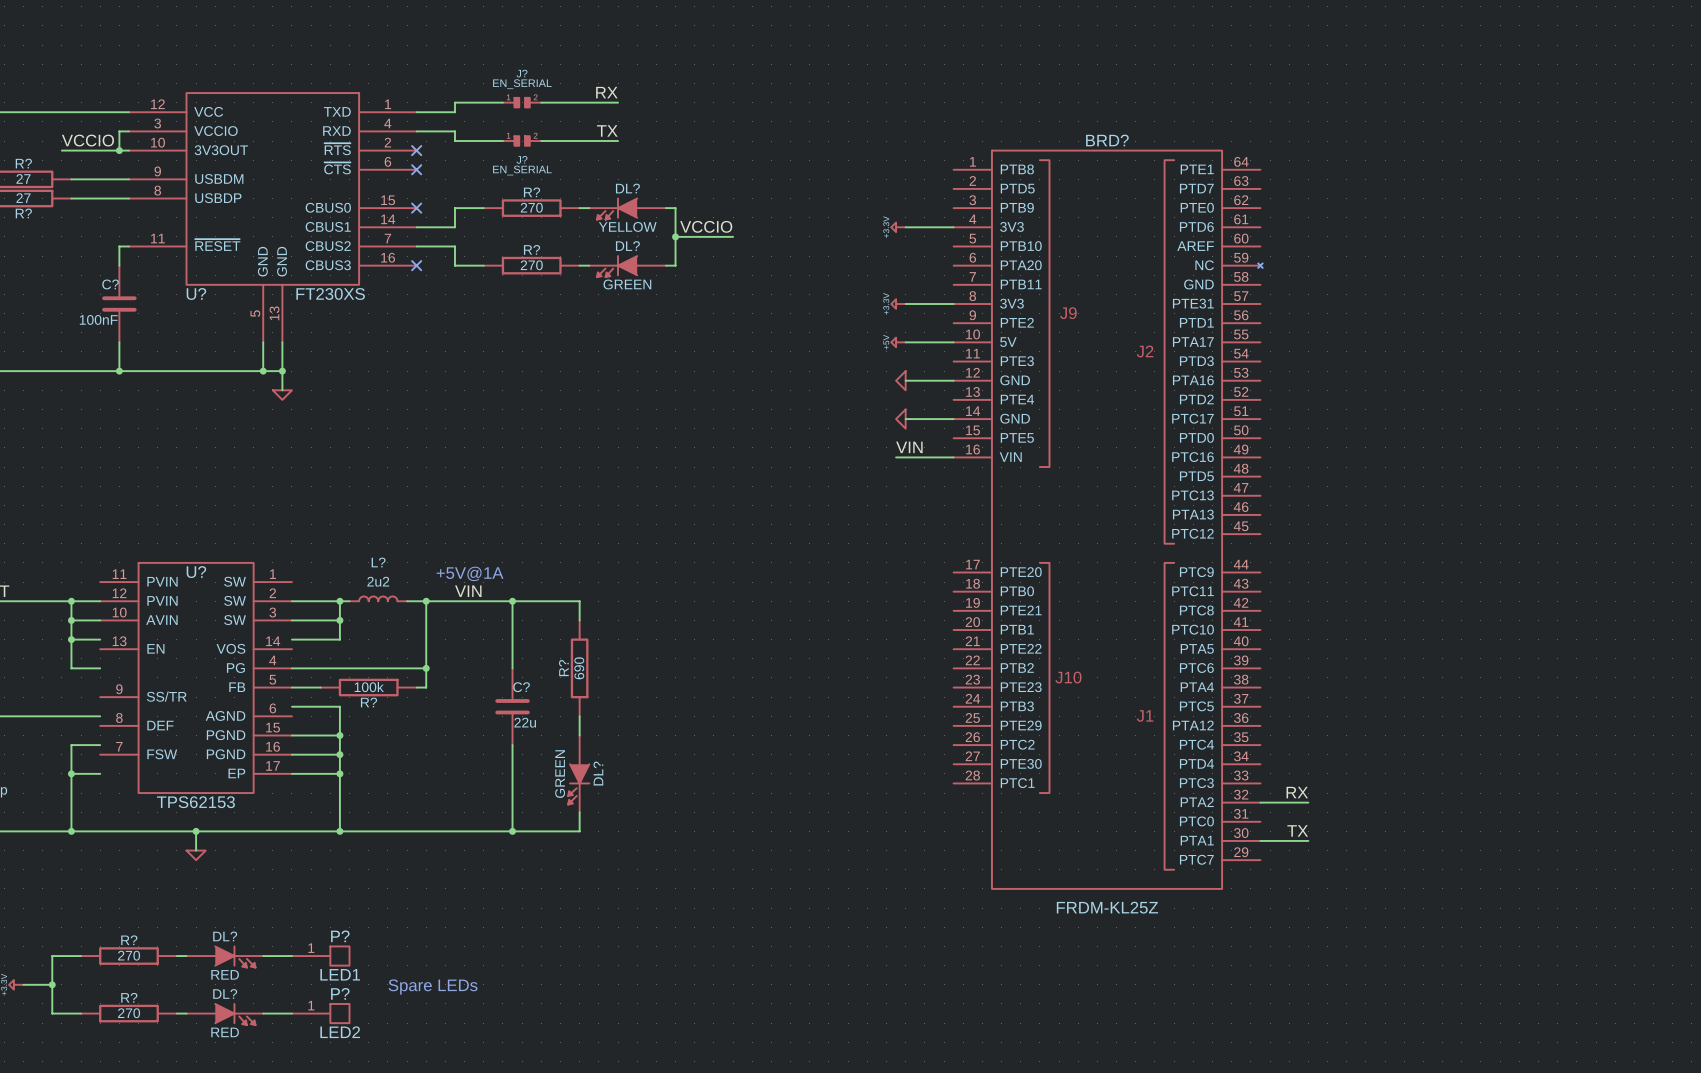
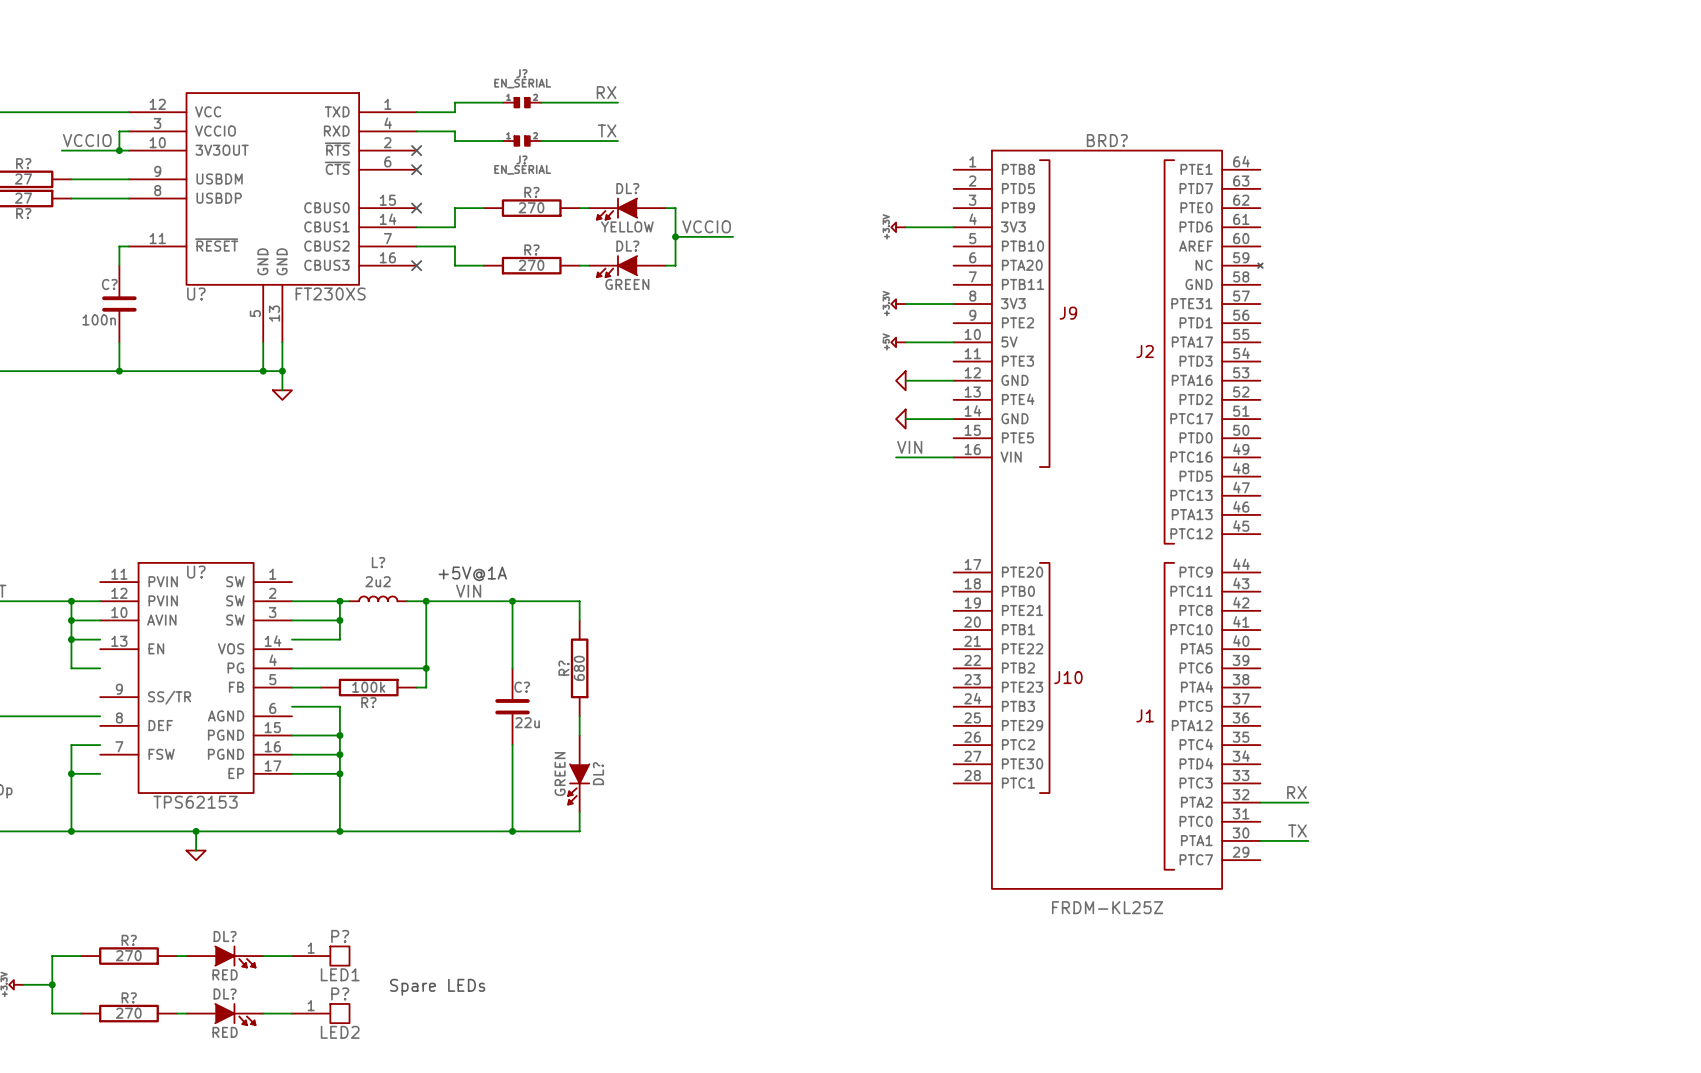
C? value: 100nF (98, 319) -> 100n (99, 319)
R? value: 690 (579, 668) -> 680 (579, 668)

